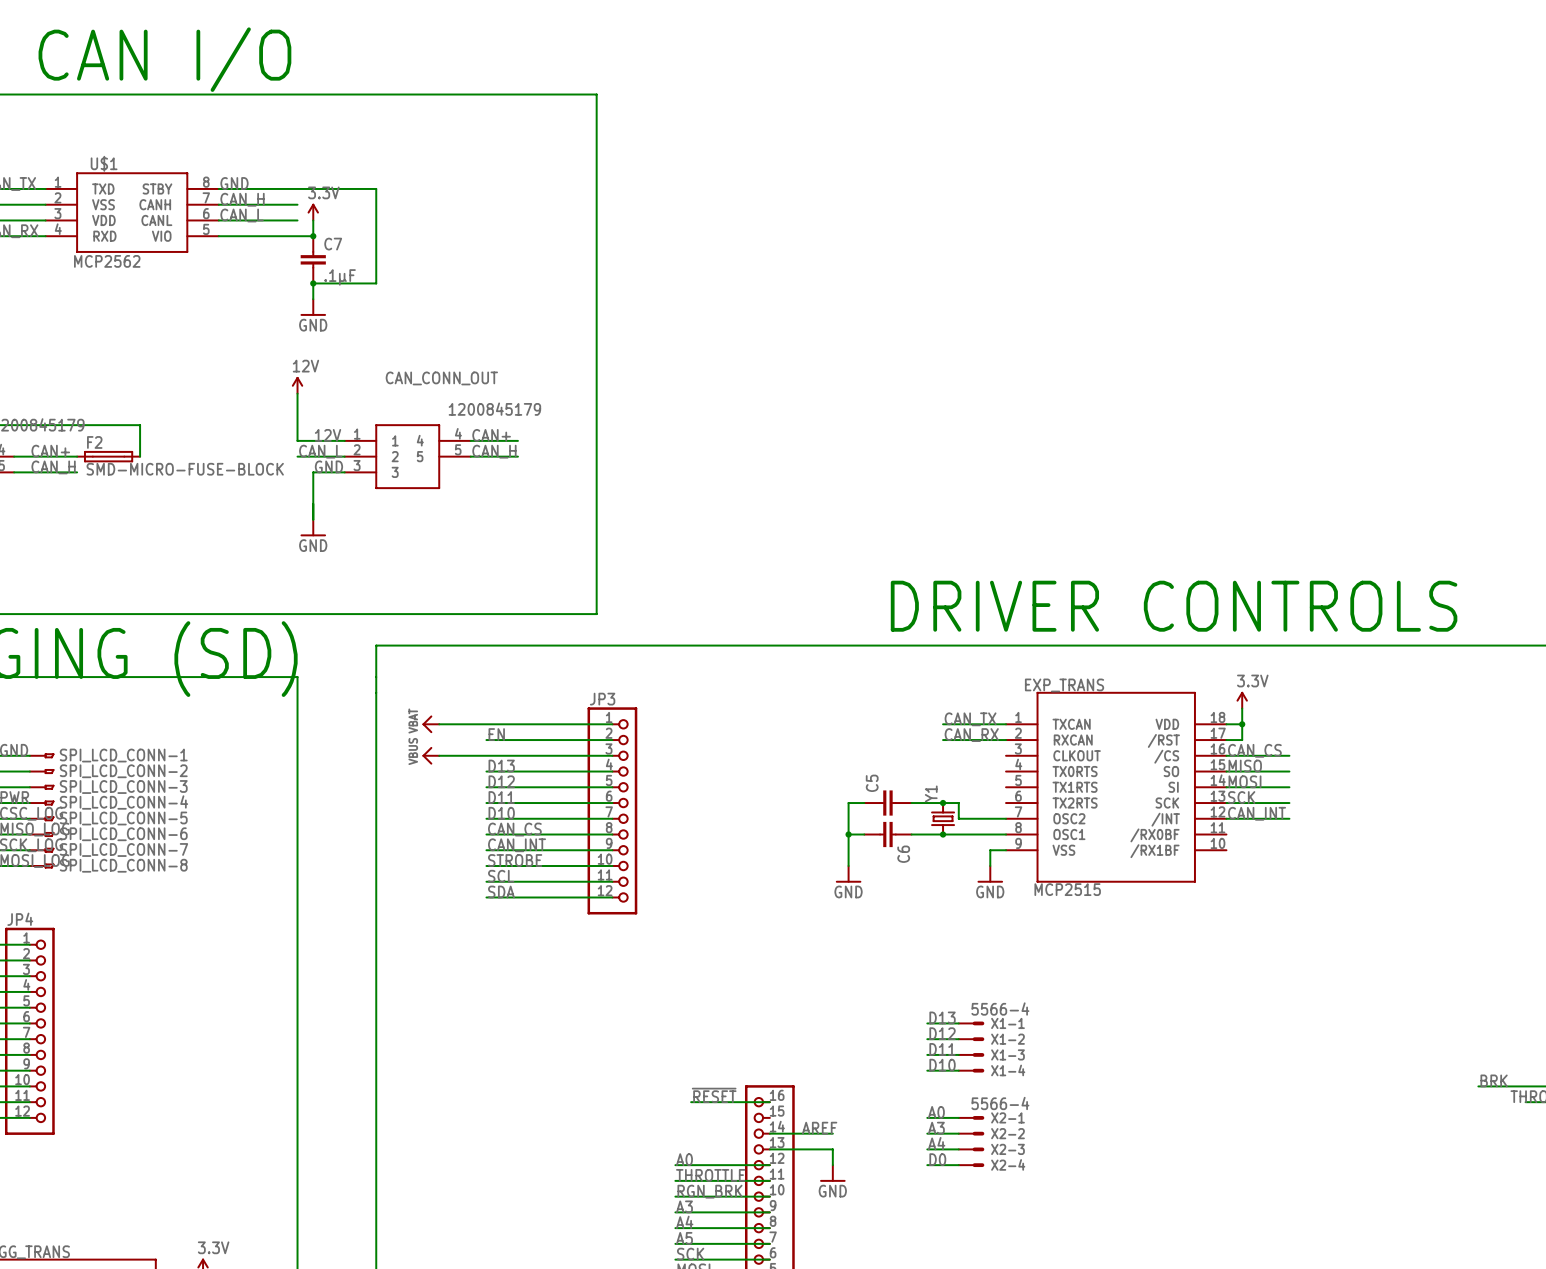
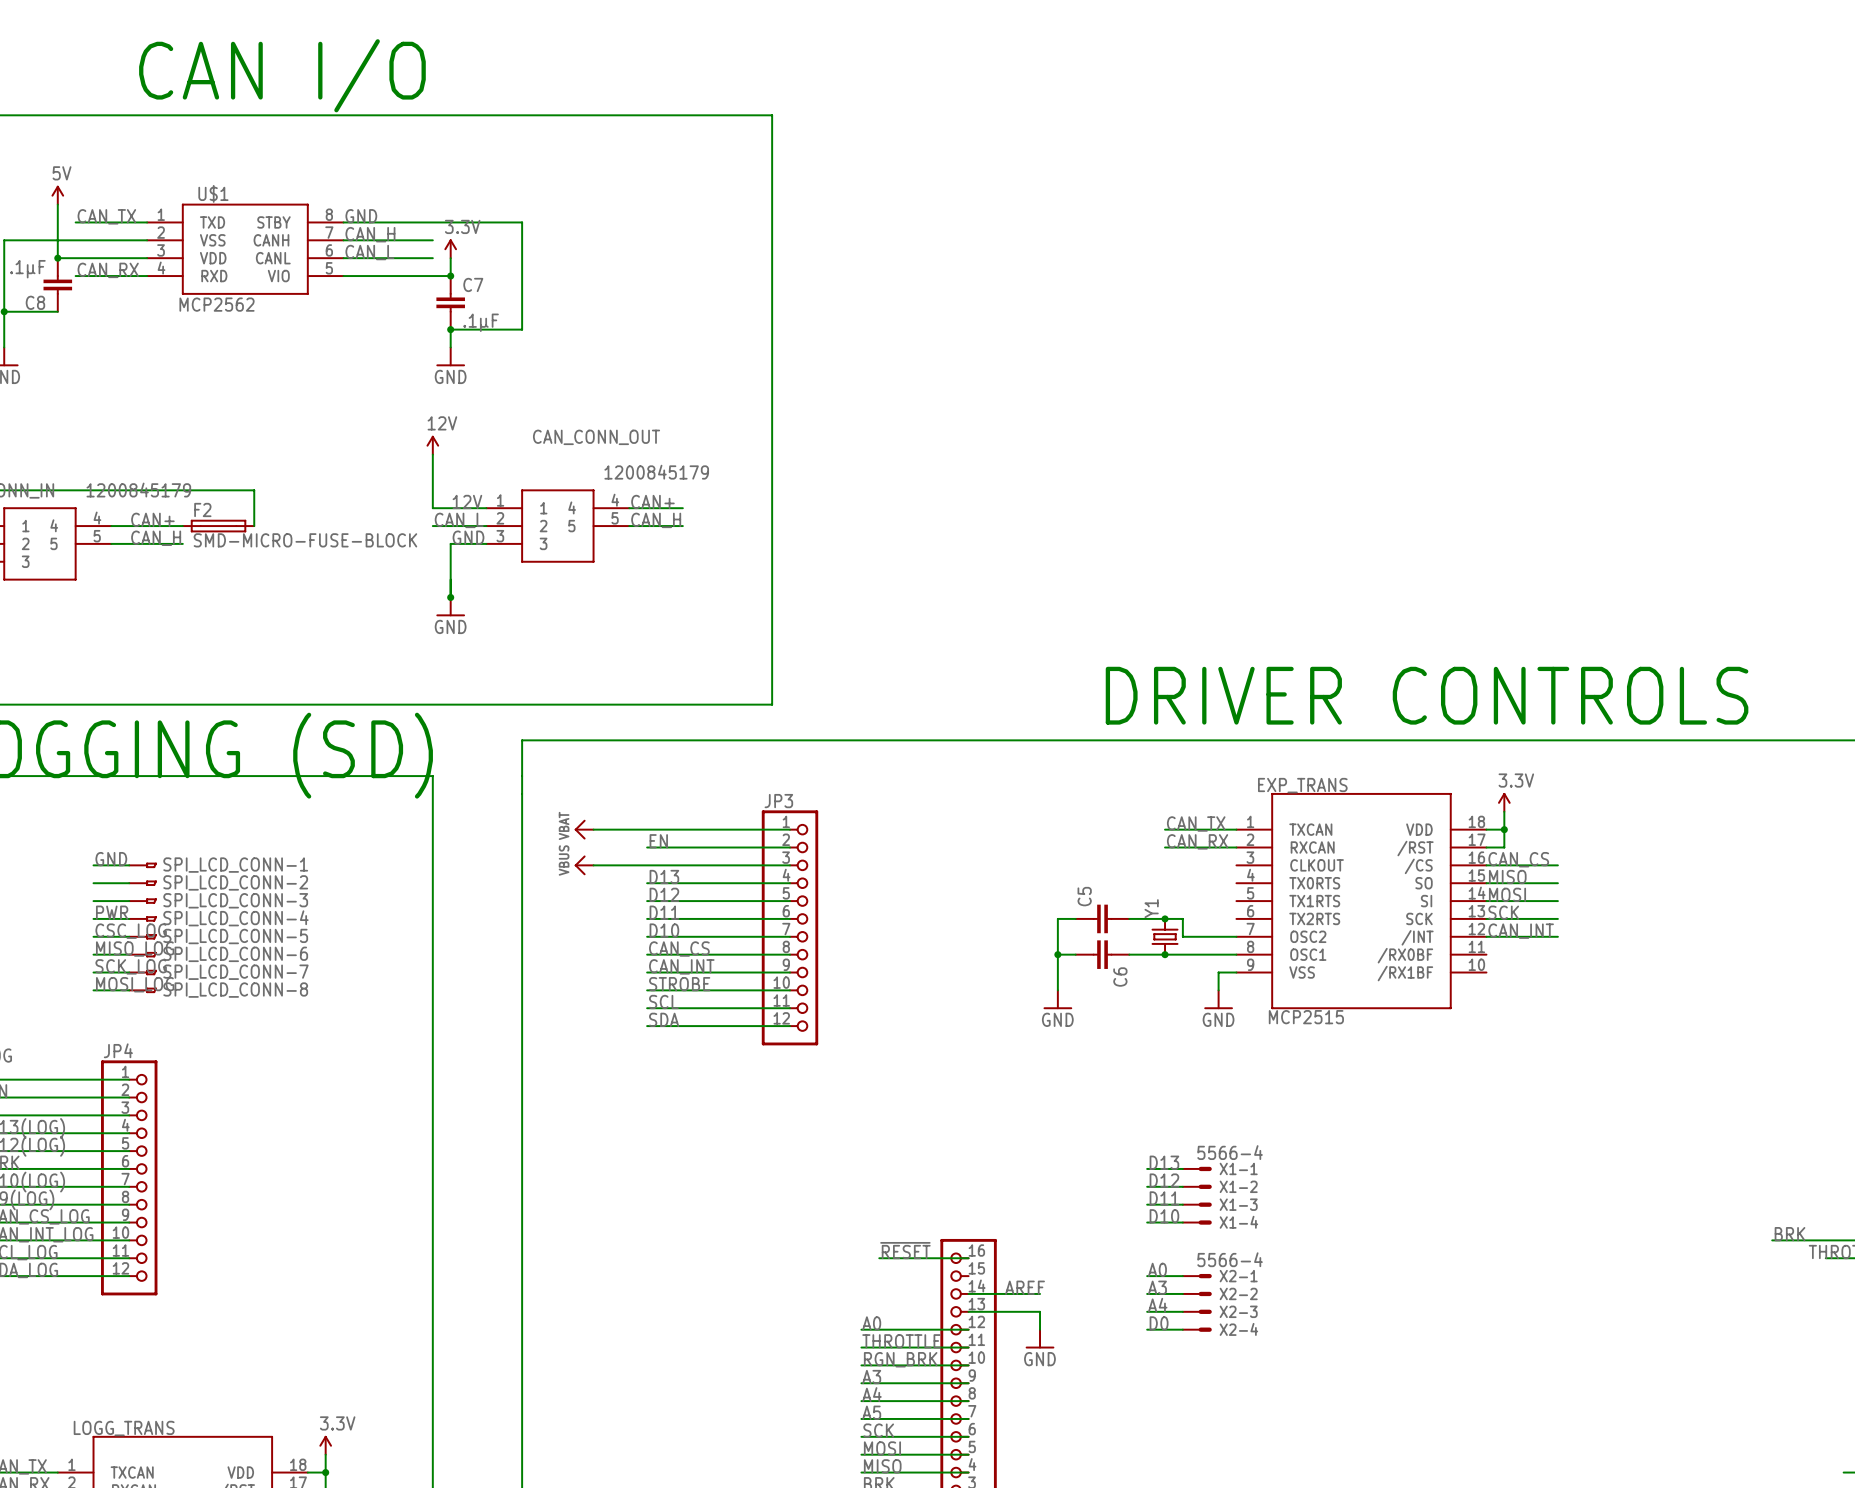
junction: none -> (450, 597)

